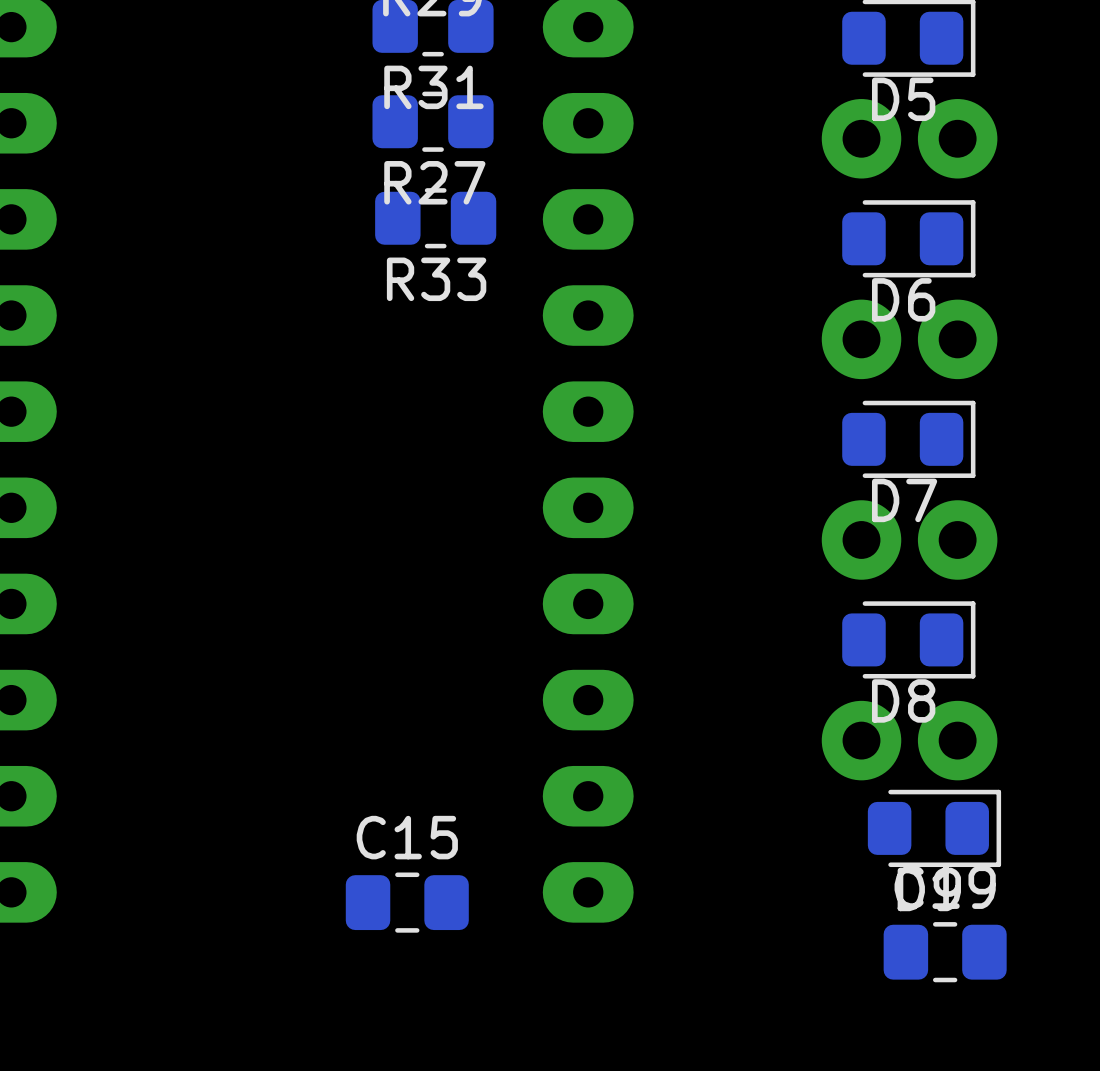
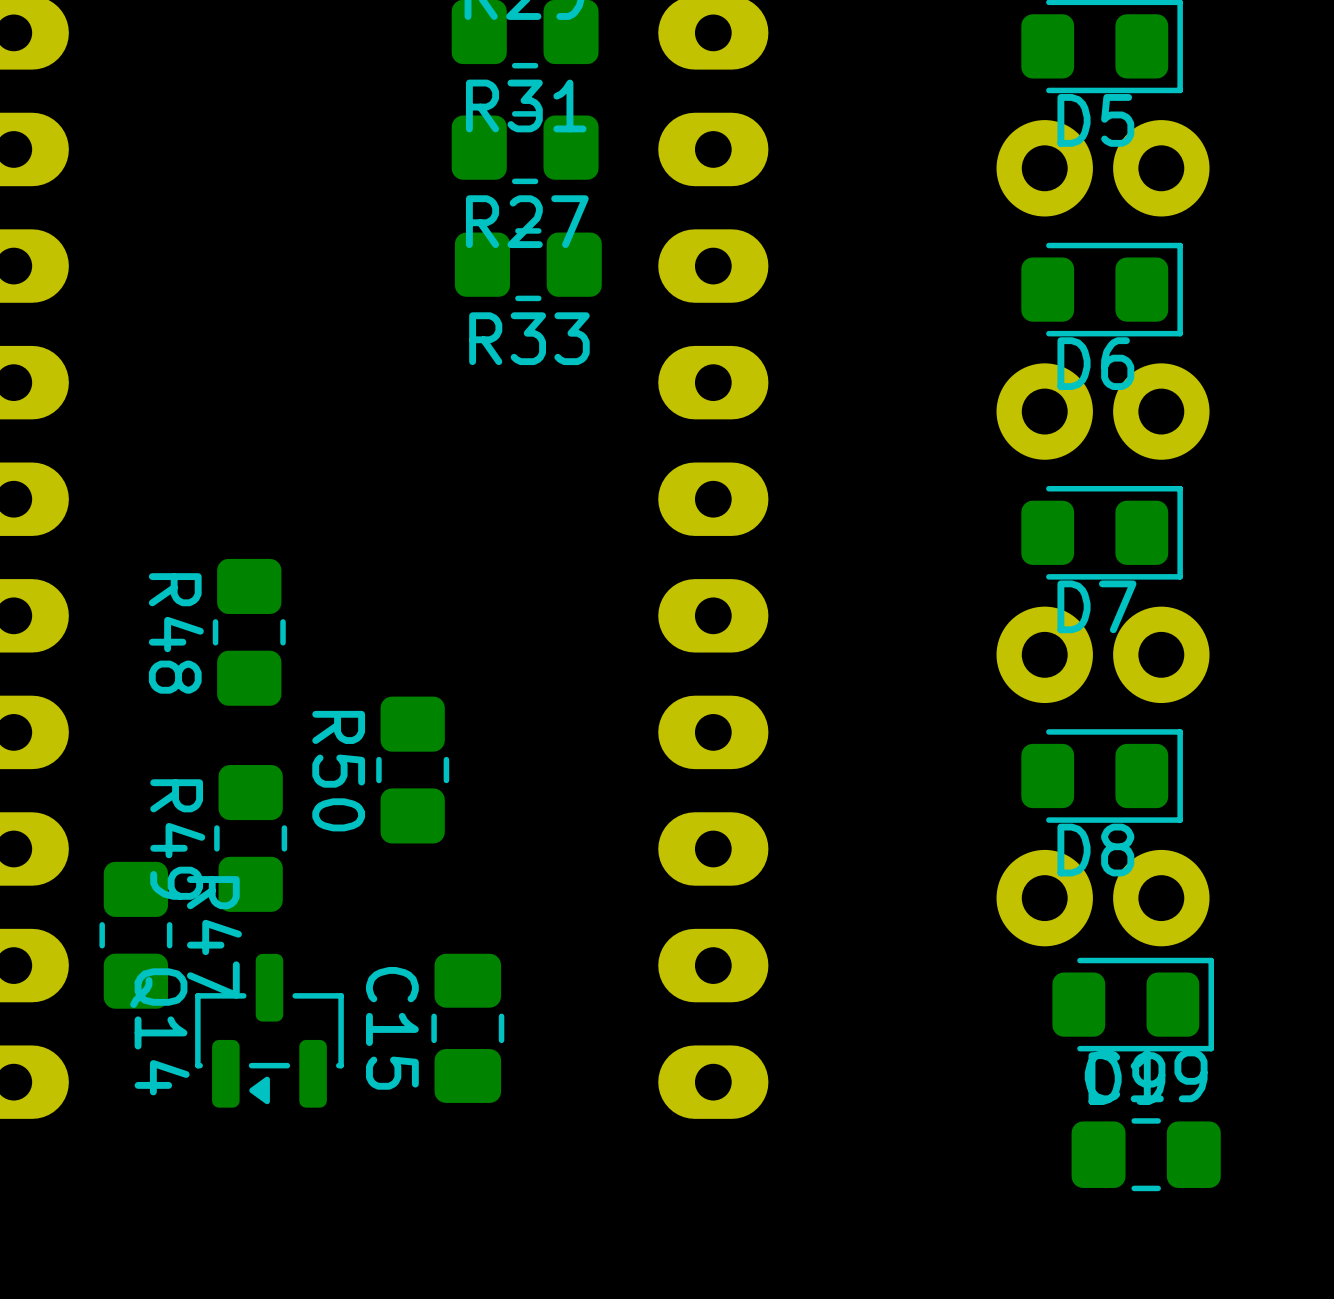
R48: none -> (249, 632)
R50: none -> (412, 770)
R49: none -> (250, 838)
R47: none -> (135, 935)
C15 name position: C15 (407, 837) -> C15 (392, 1028)
Q14: none -> (269, 1030)
C15 rotation: 0° (407, 902) -> 90° clockwise (467, 1028)

